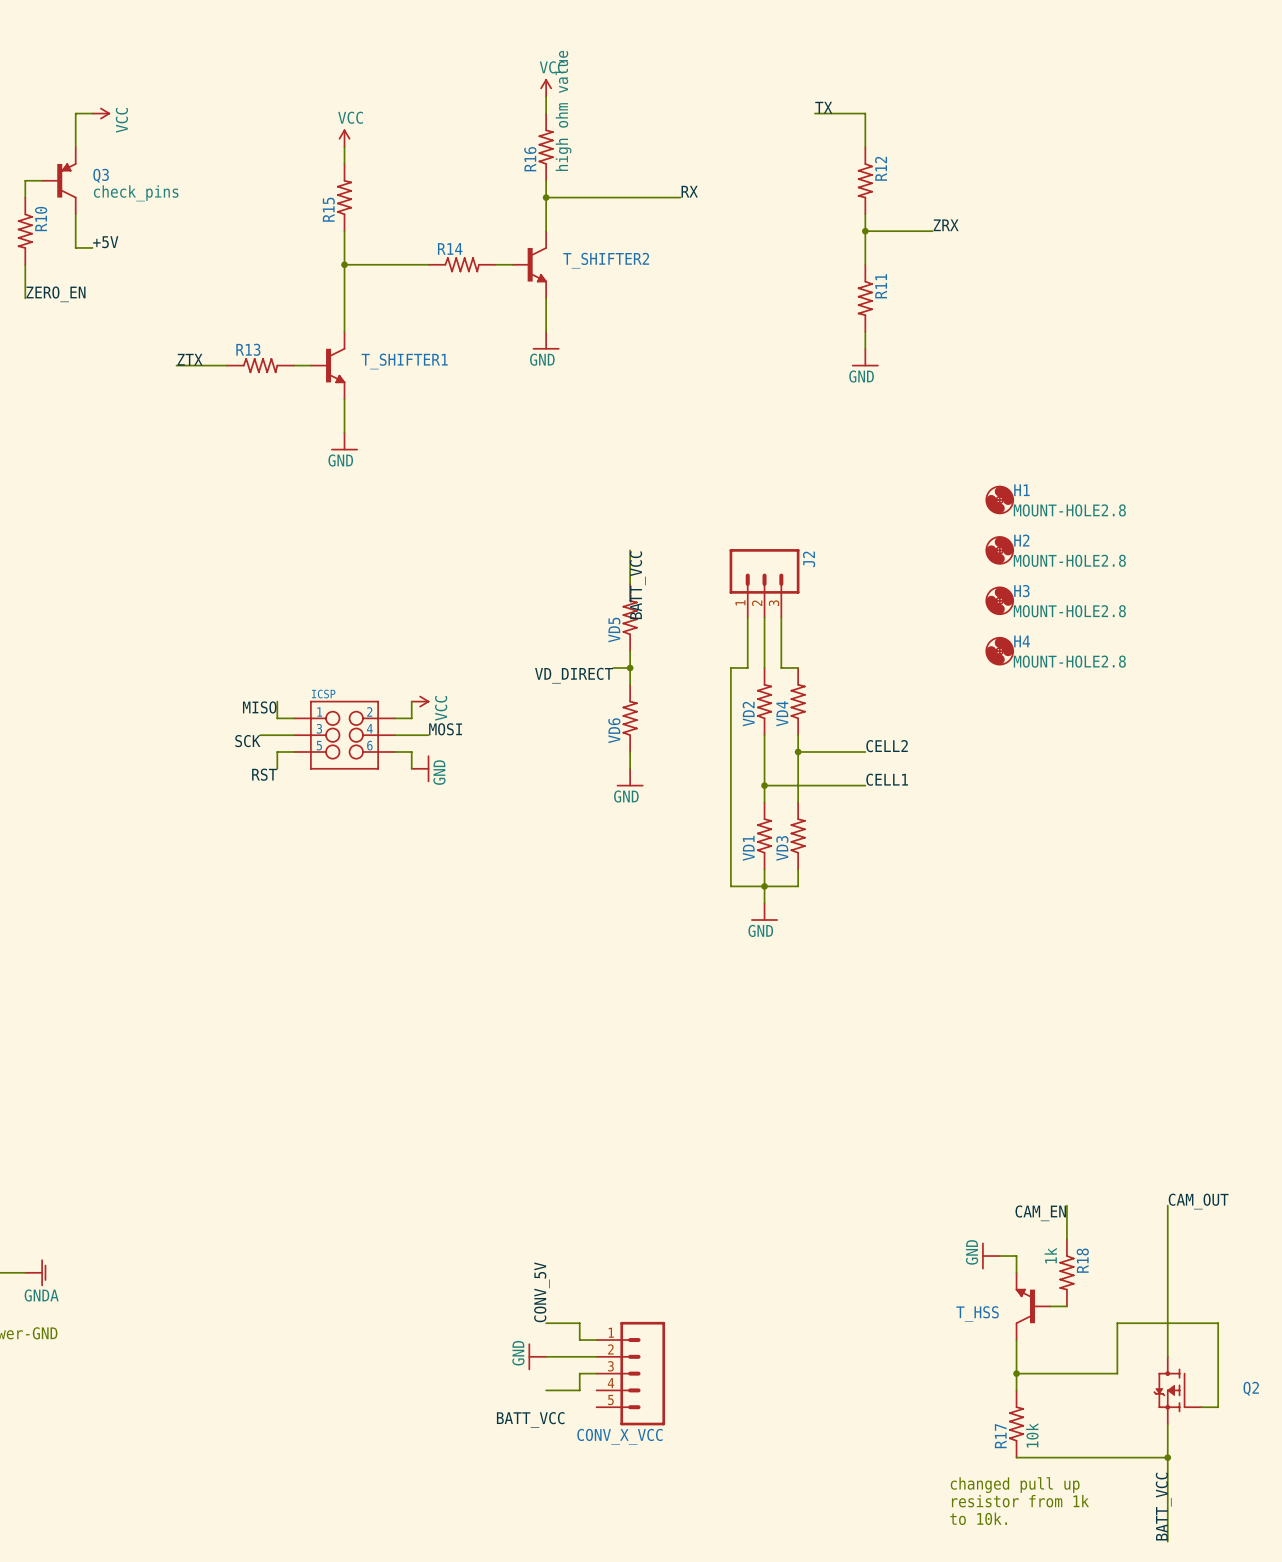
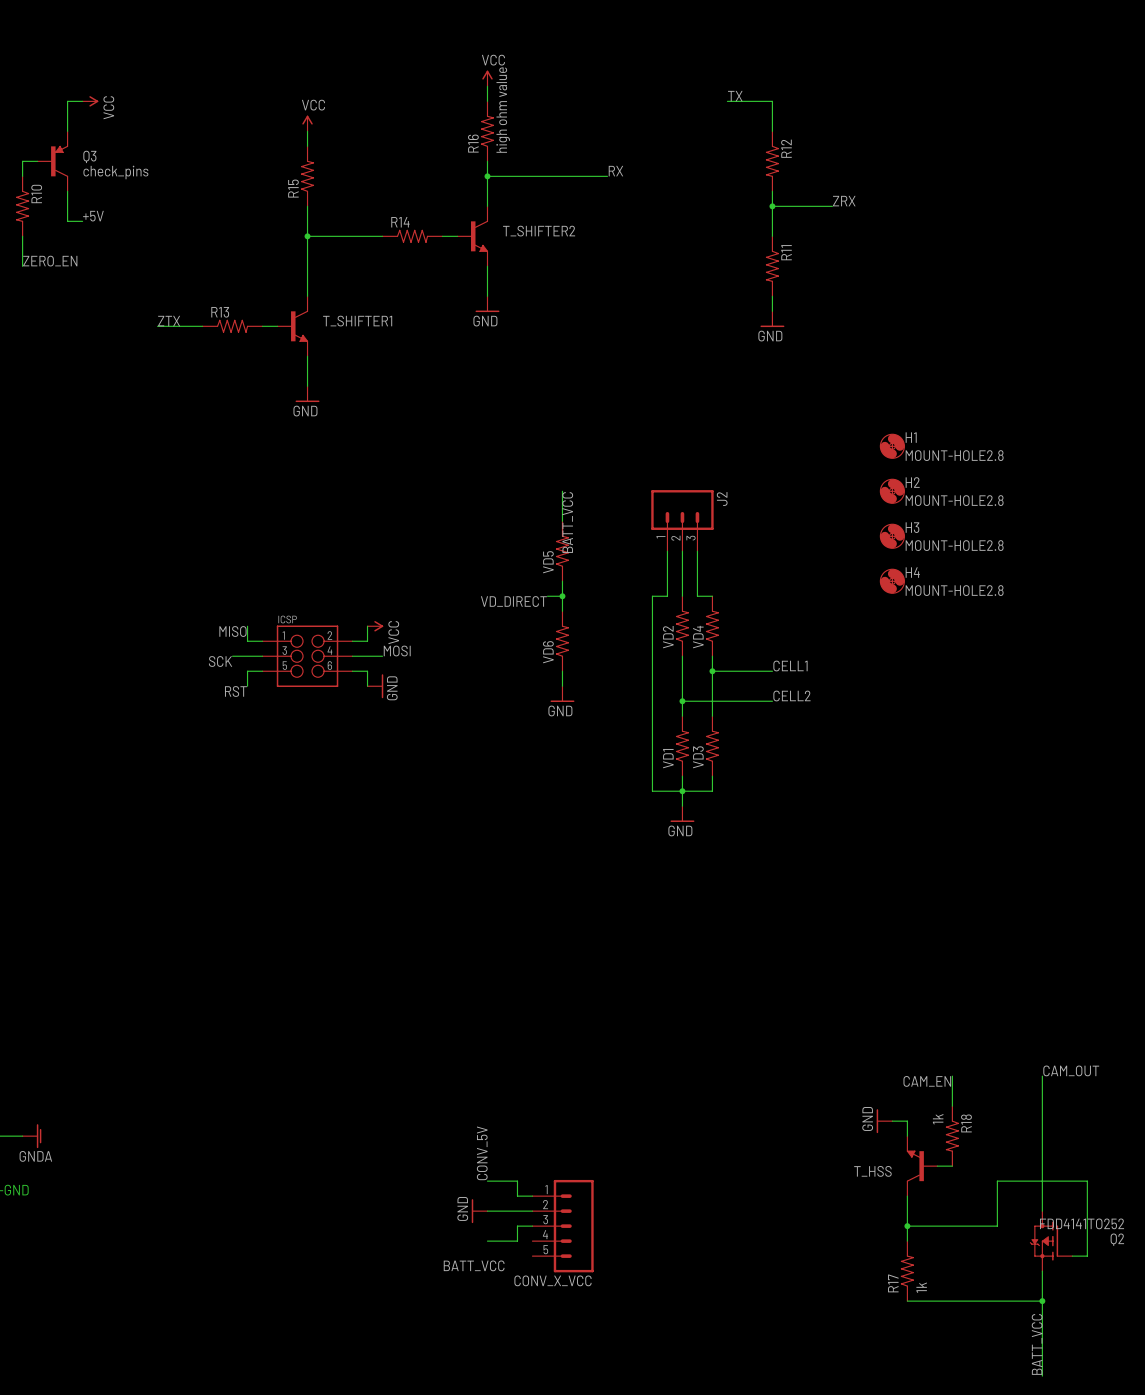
label: CELL2 (887, 746) -> CELL1 (790, 666)
label: CELL1 (887, 779) -> CELL2 (791, 696)
Q2 value: none -> FDD4141TO252 (1082, 1223)
R17 value: 10k (1032, 1435) -> 1k (921, 1287)
text: changed pull up (1015, 1485) -> none
text: resistor from 1k (1020, 1501) -> none
text: to 10k. (978, 1518) -> none

